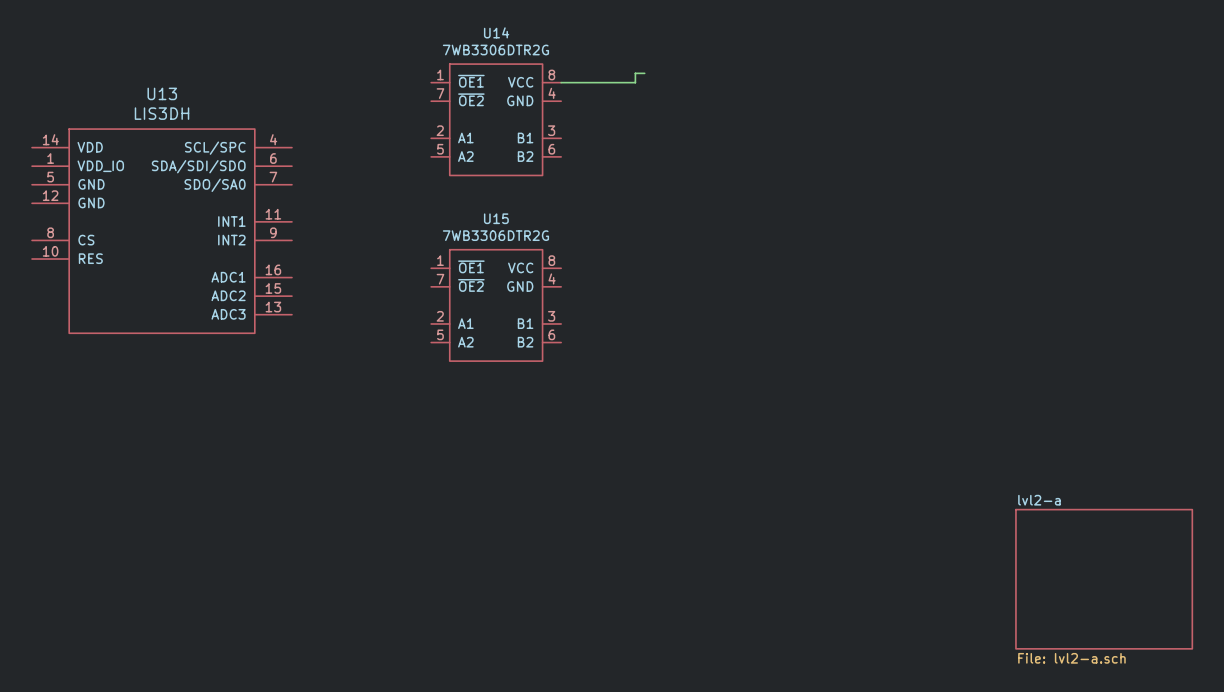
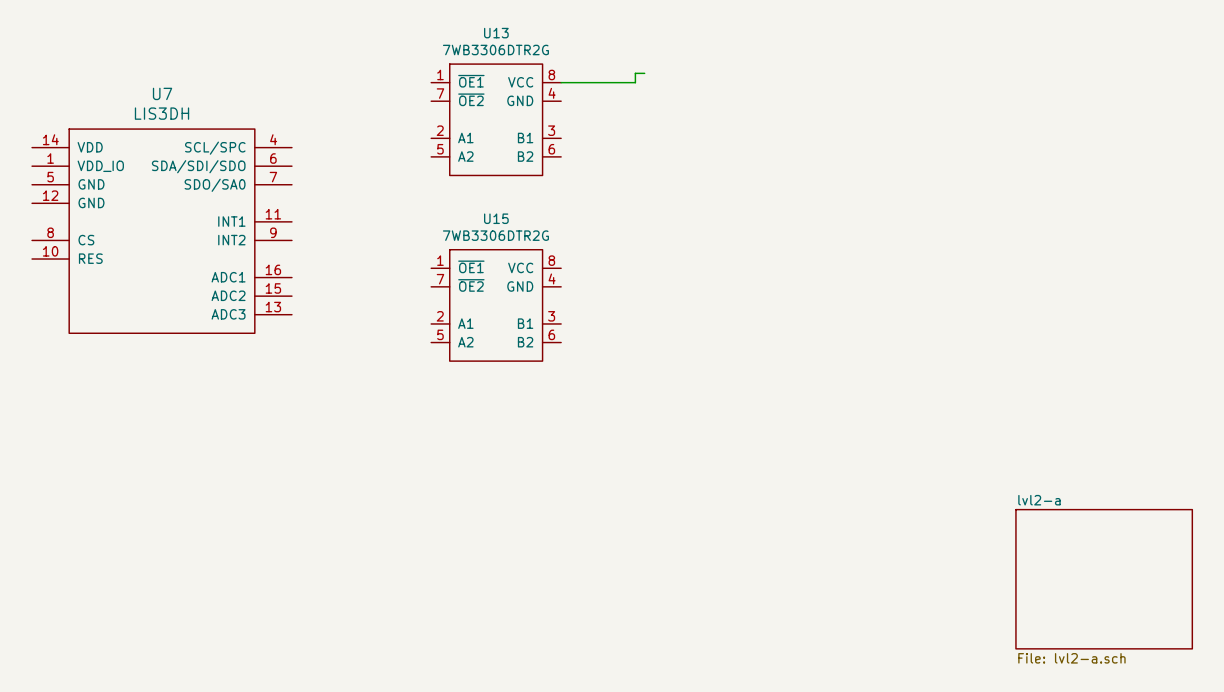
U14 name: U14 (496, 32) -> U13 (496, 33)
U13 name: U13 (162, 93) -> U7 (162, 93)

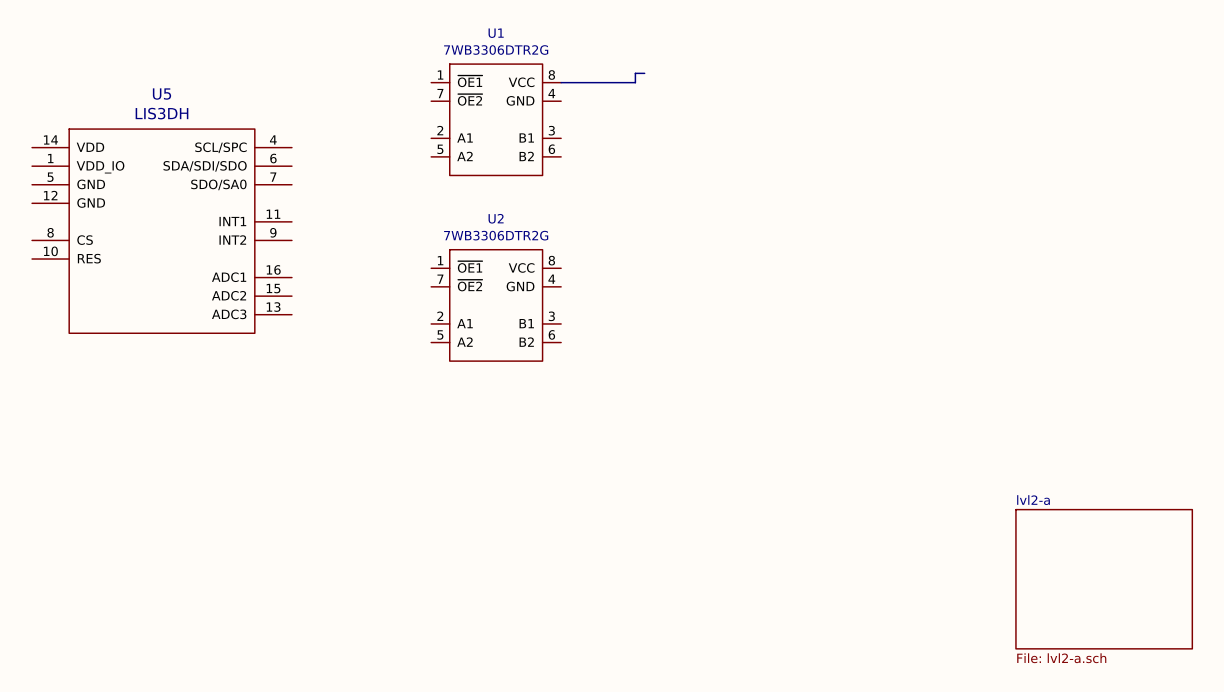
U13 name: U13 (496, 33) -> U1 (496, 33)
U7 name: U7 (162, 93) -> U5 (162, 94)
U15 name: U15 (496, 218) -> U2 (496, 218)

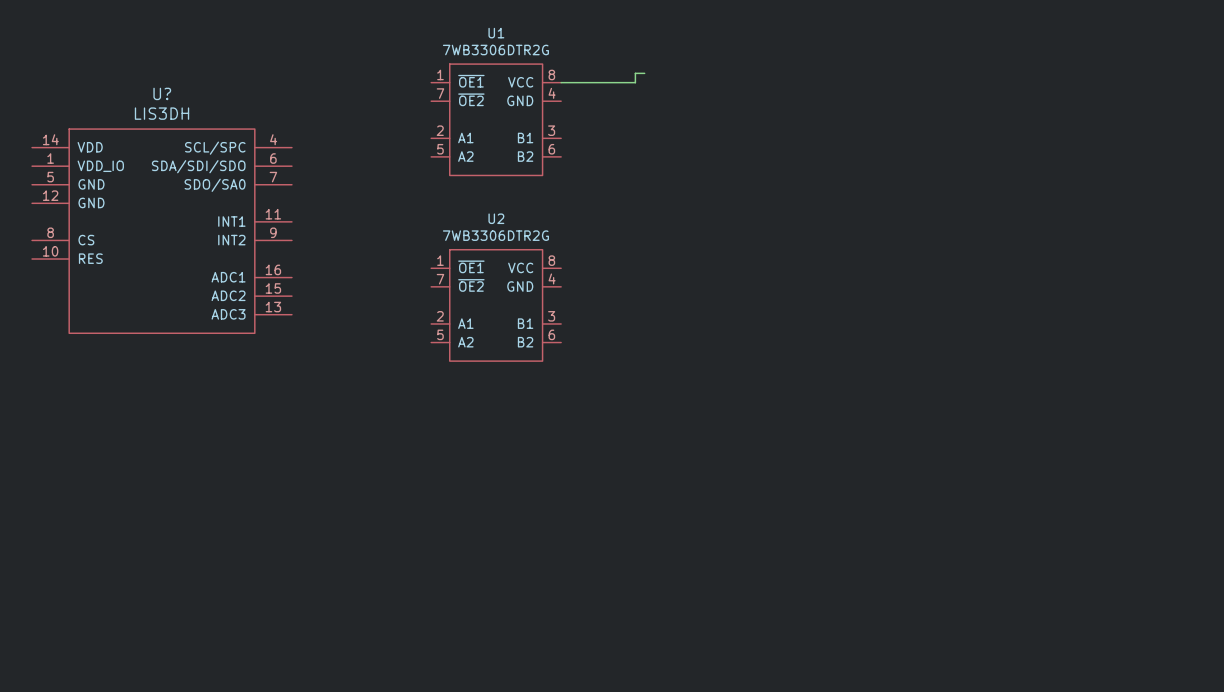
U5 name: U5 (162, 94) -> U? (162, 93)
sheet lvl2-a: File: lvl2-a.sch (1104, 579) -> none

